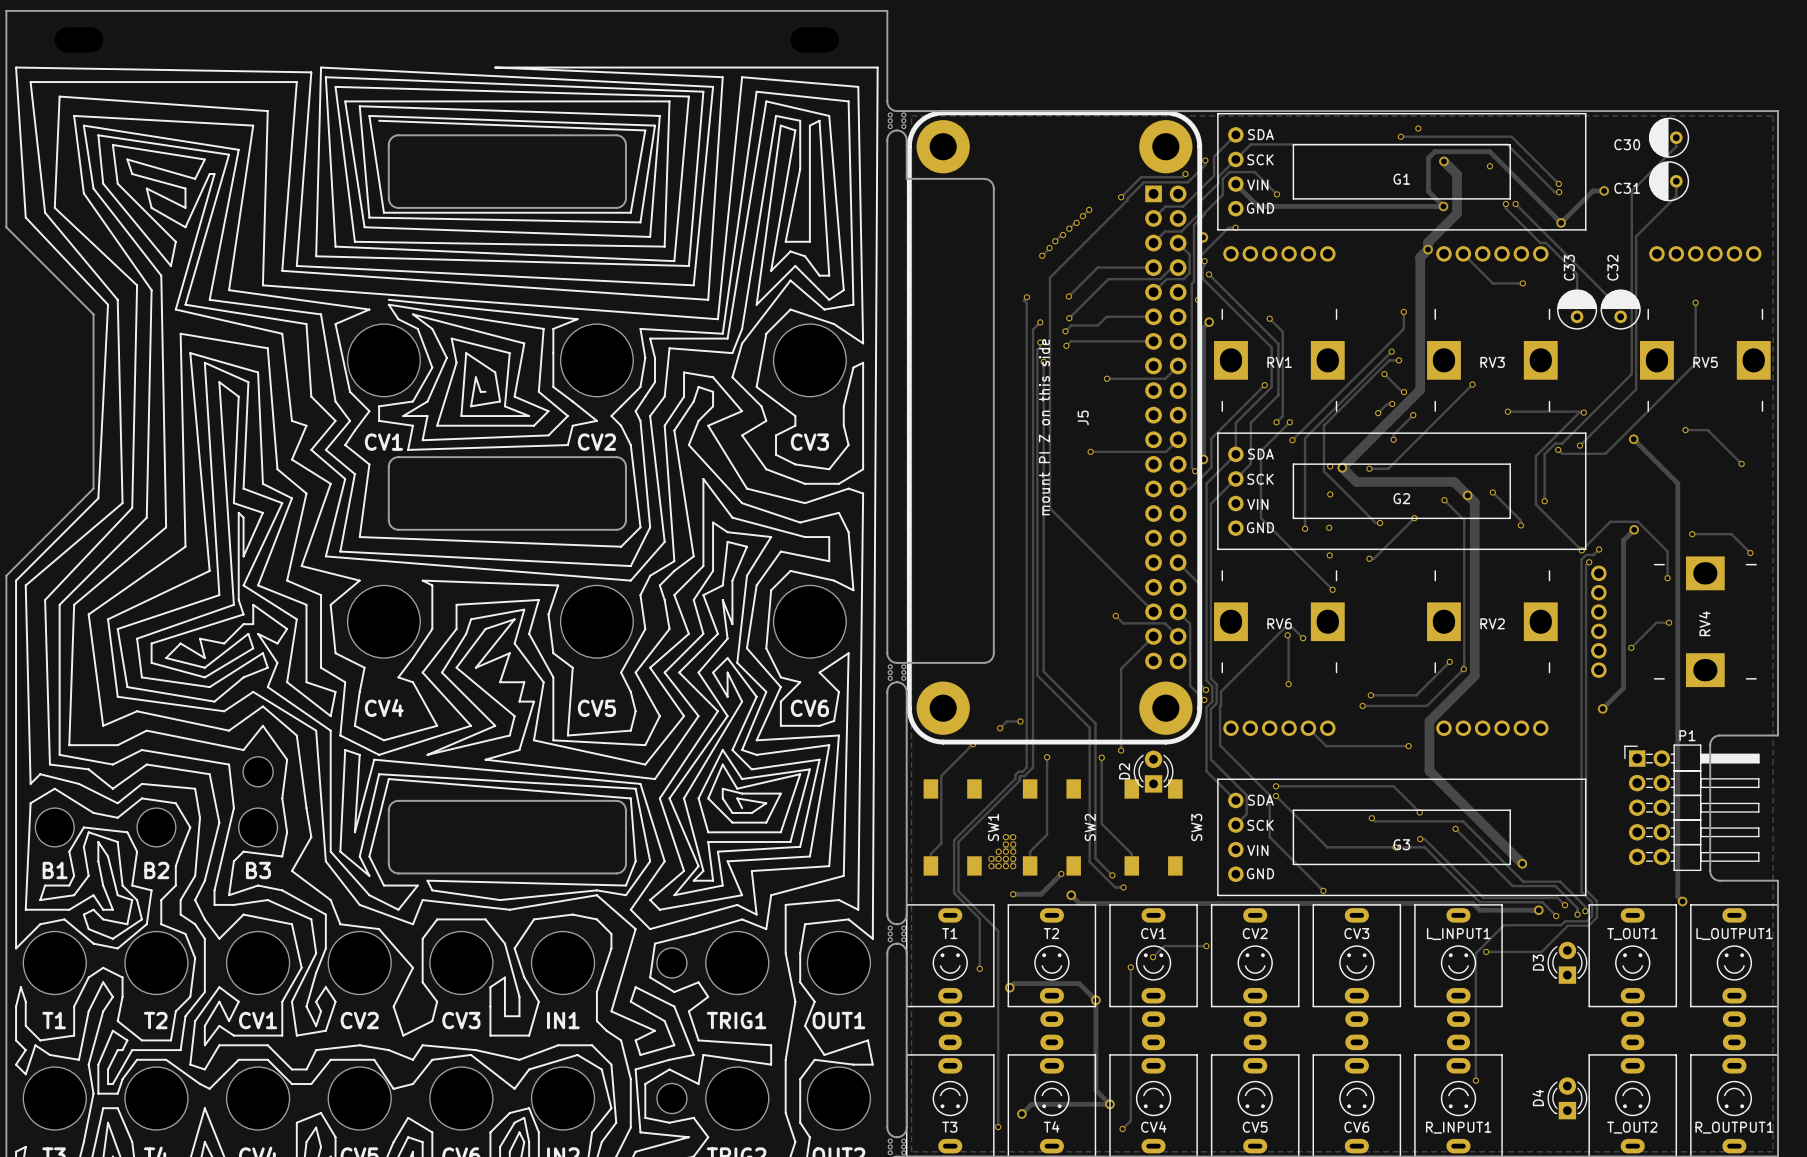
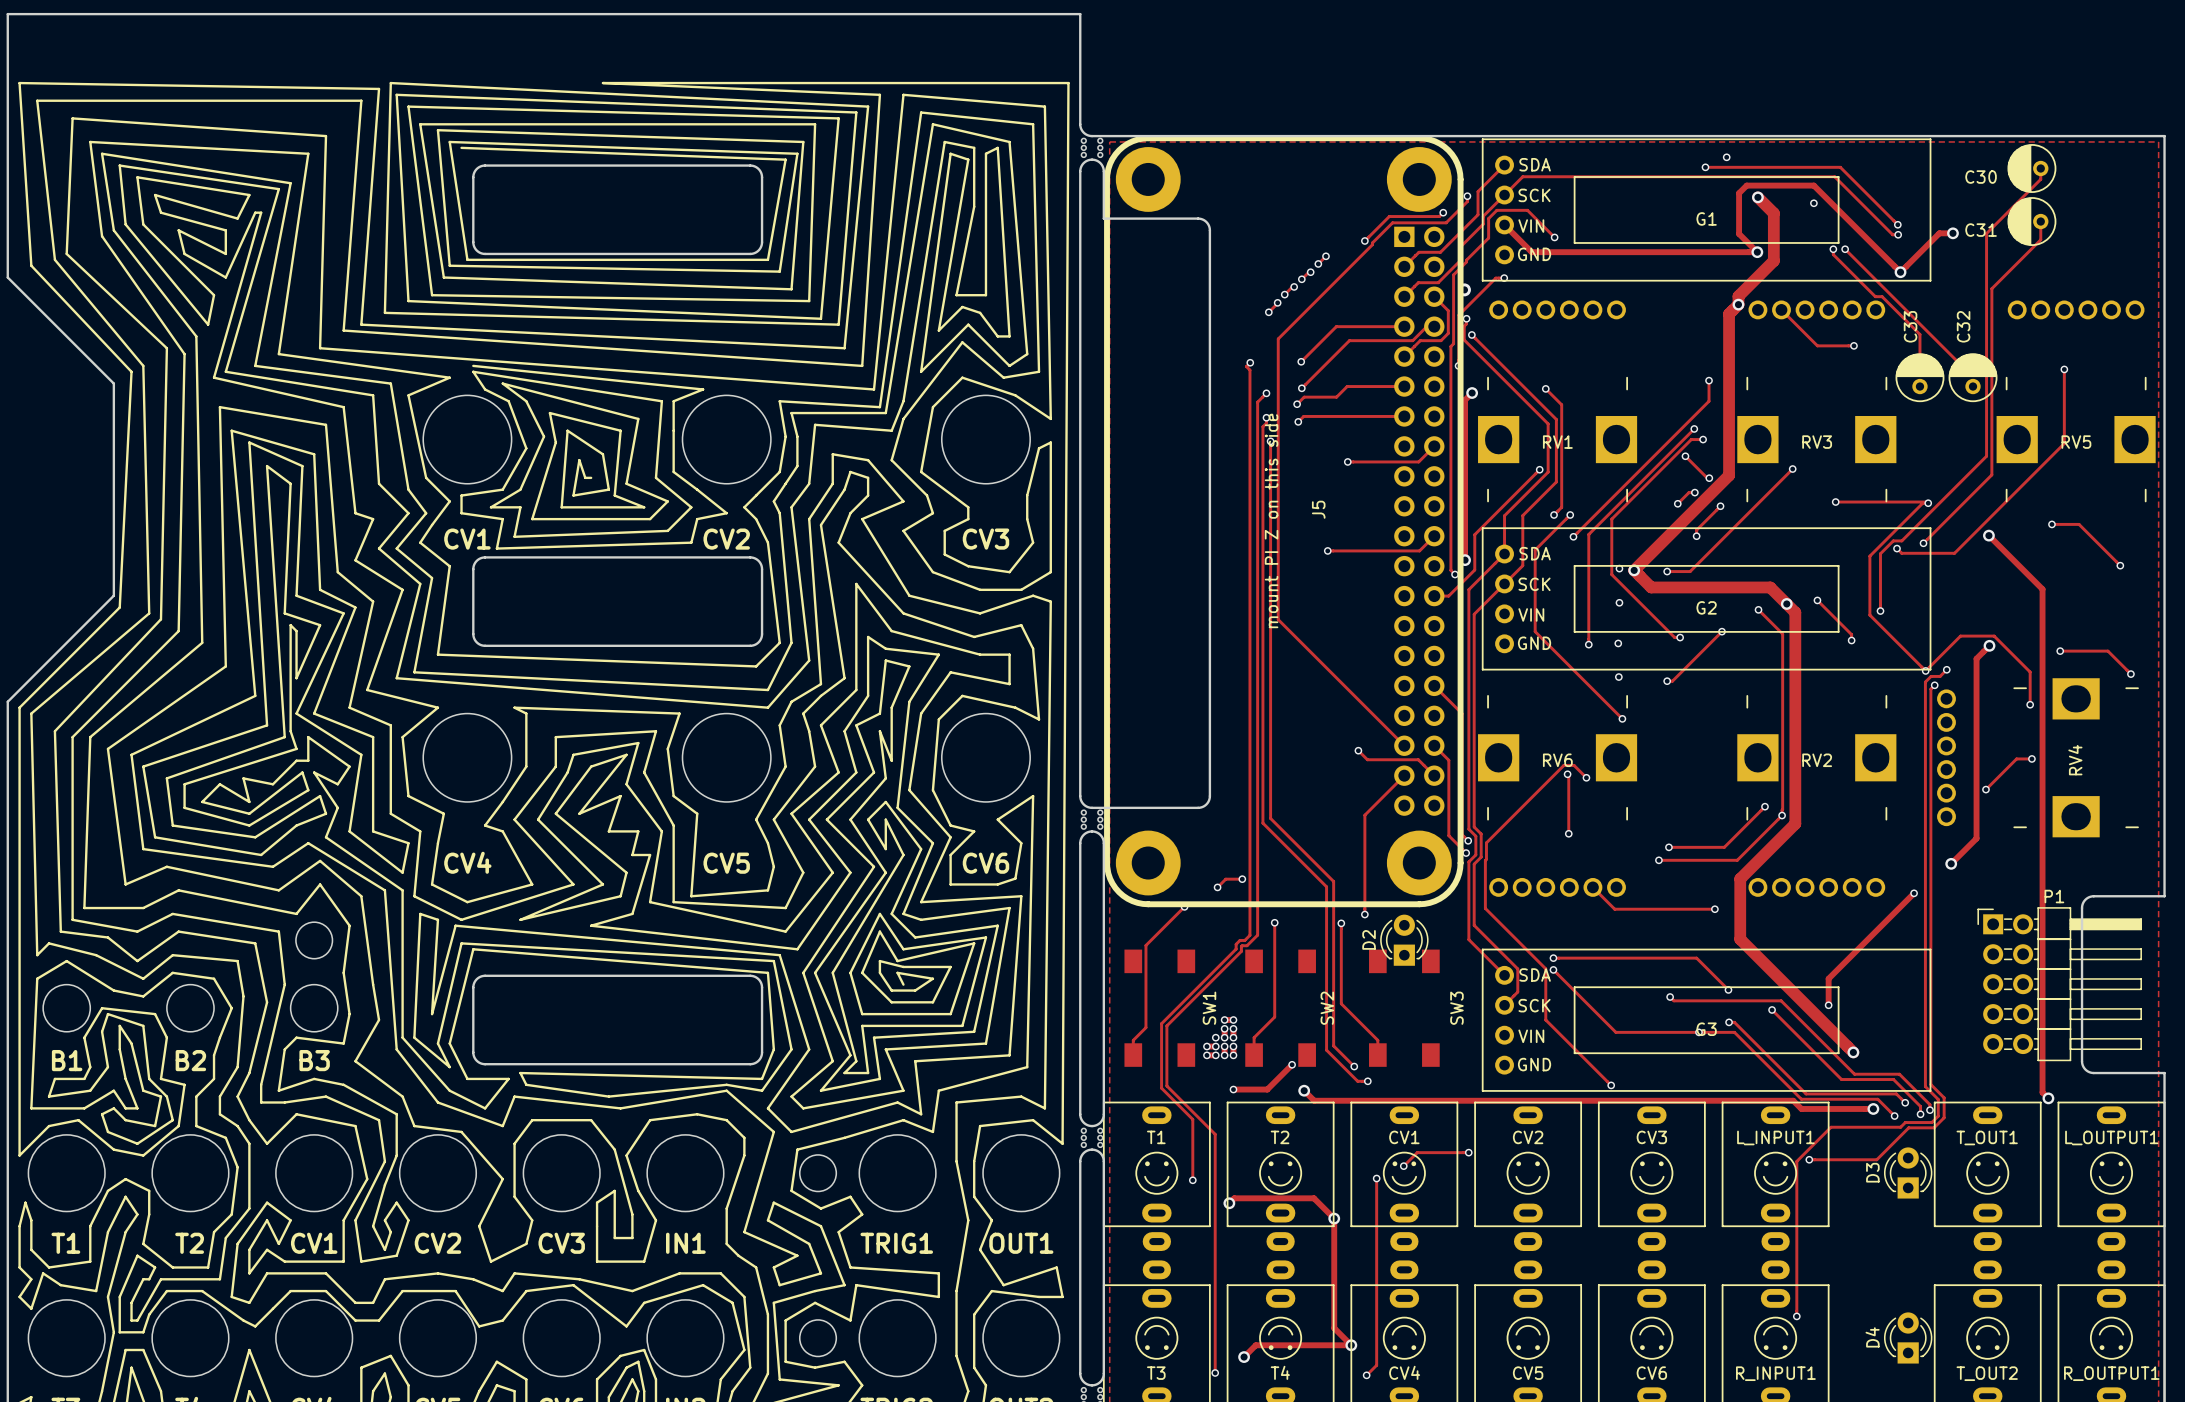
track: none -> (1914, 893) (1828, 978) (1828, 1005)
via: none -> (1914, 893)
via: none -> (1828, 1005)

